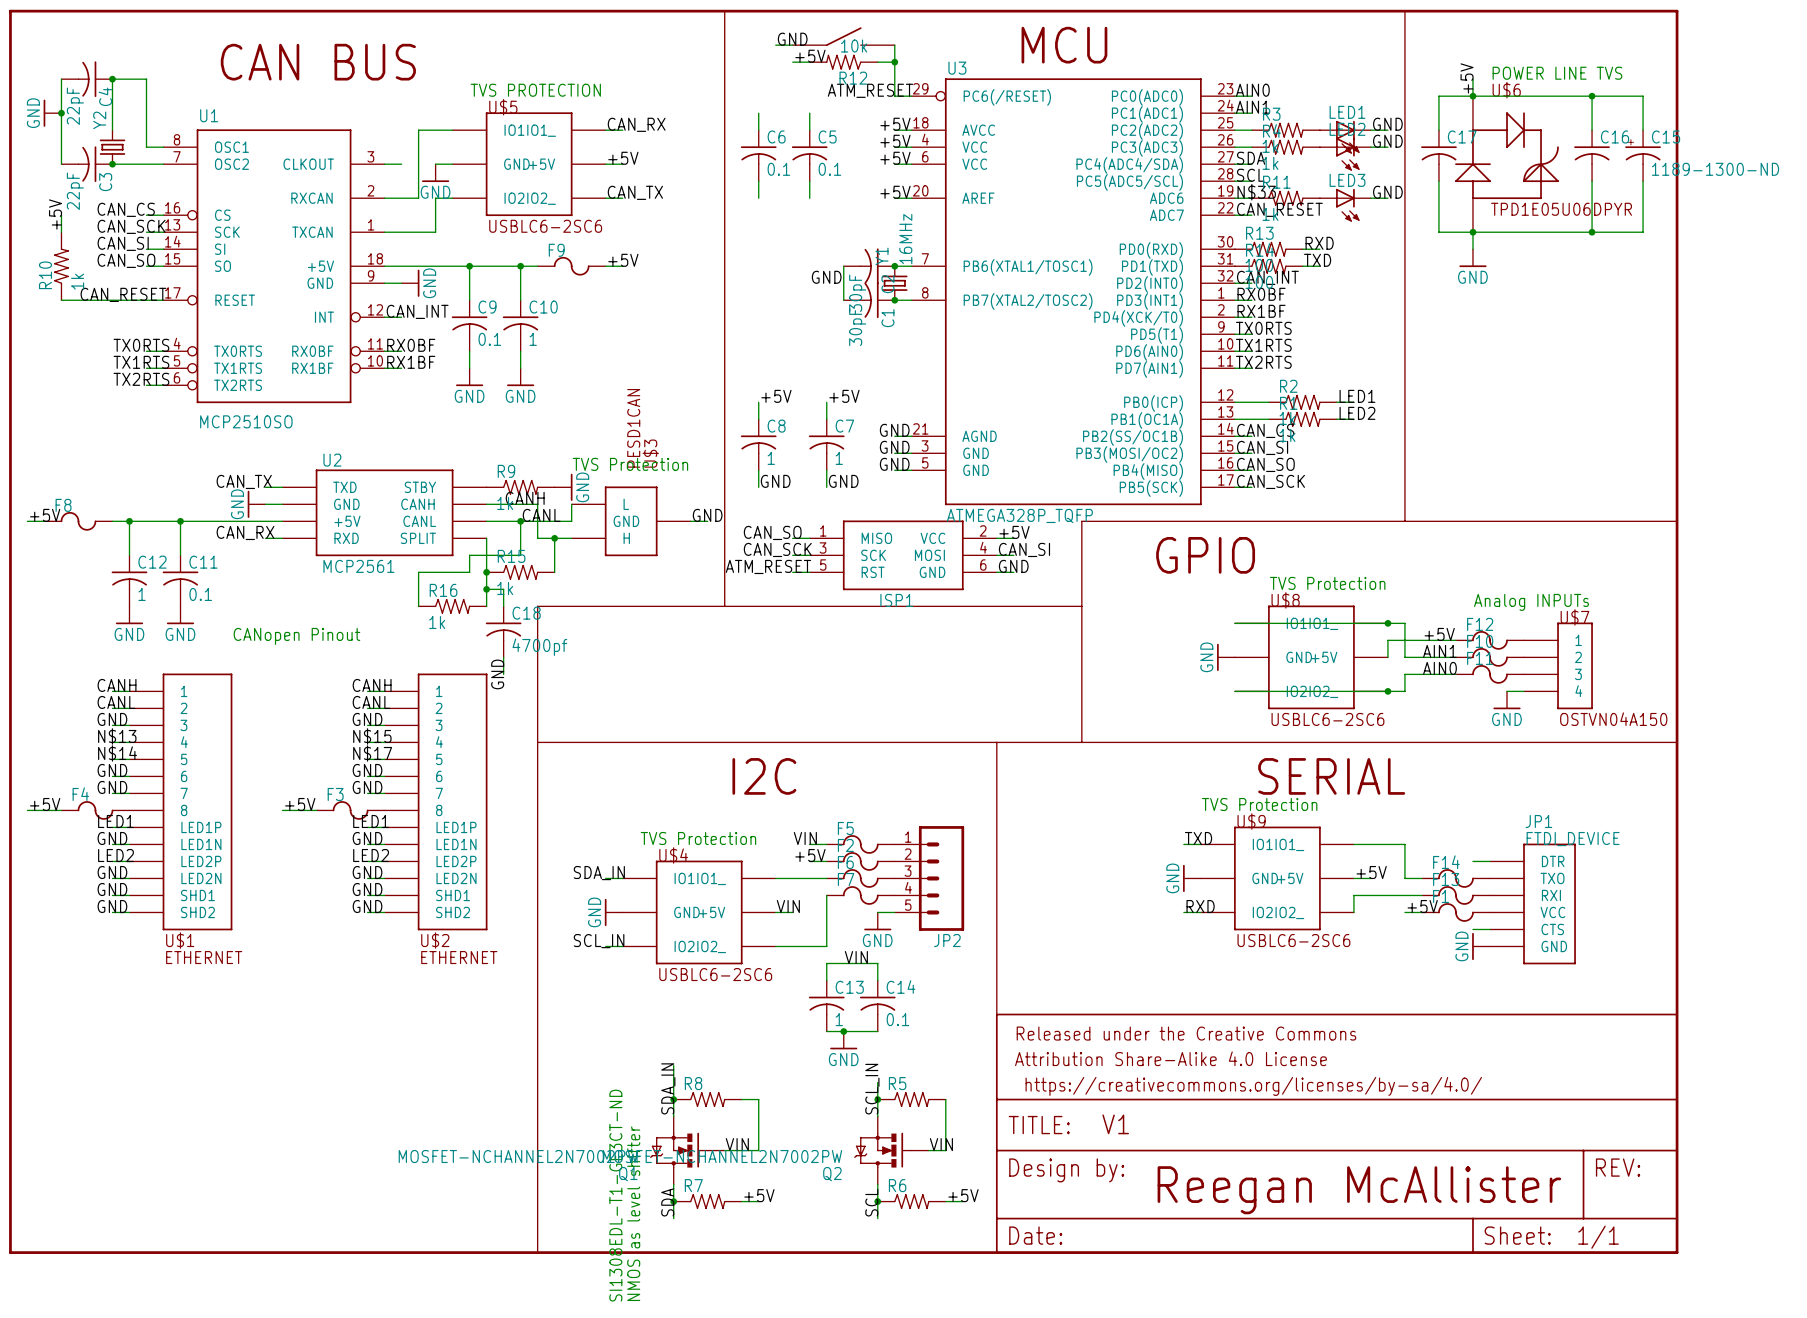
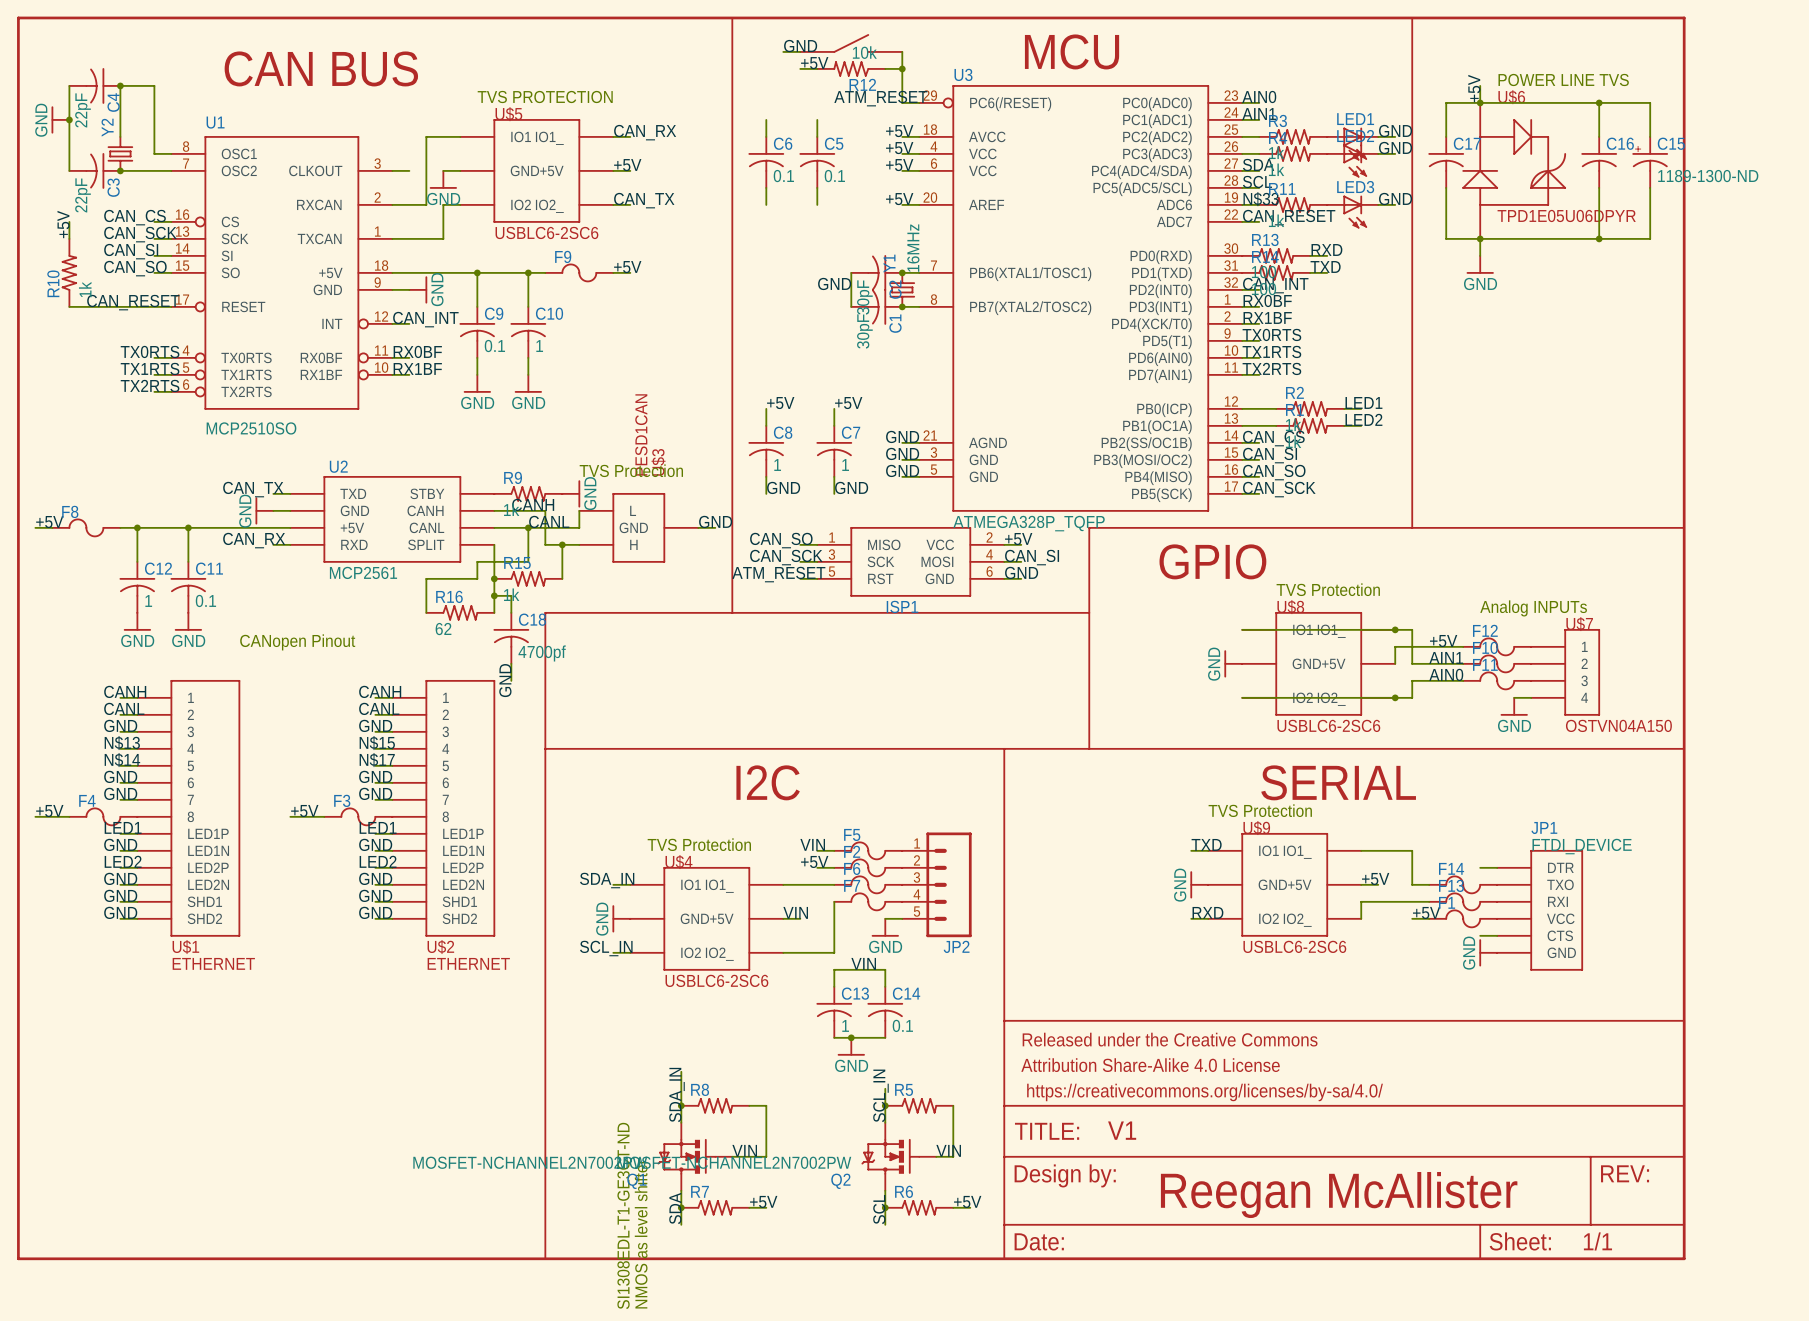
R16 value: 1k (437, 622) -> 62 (443, 629)

